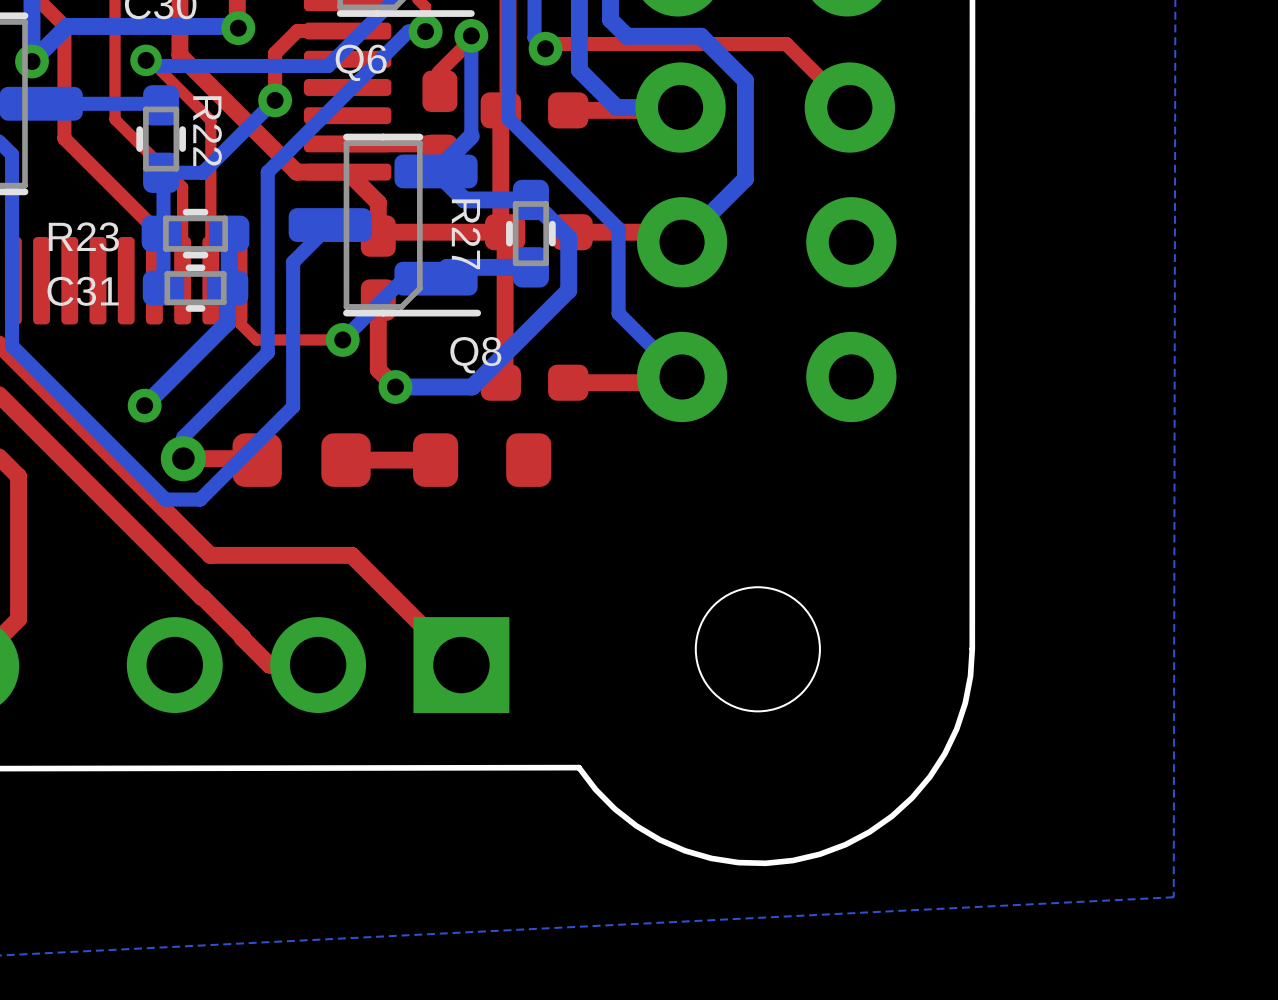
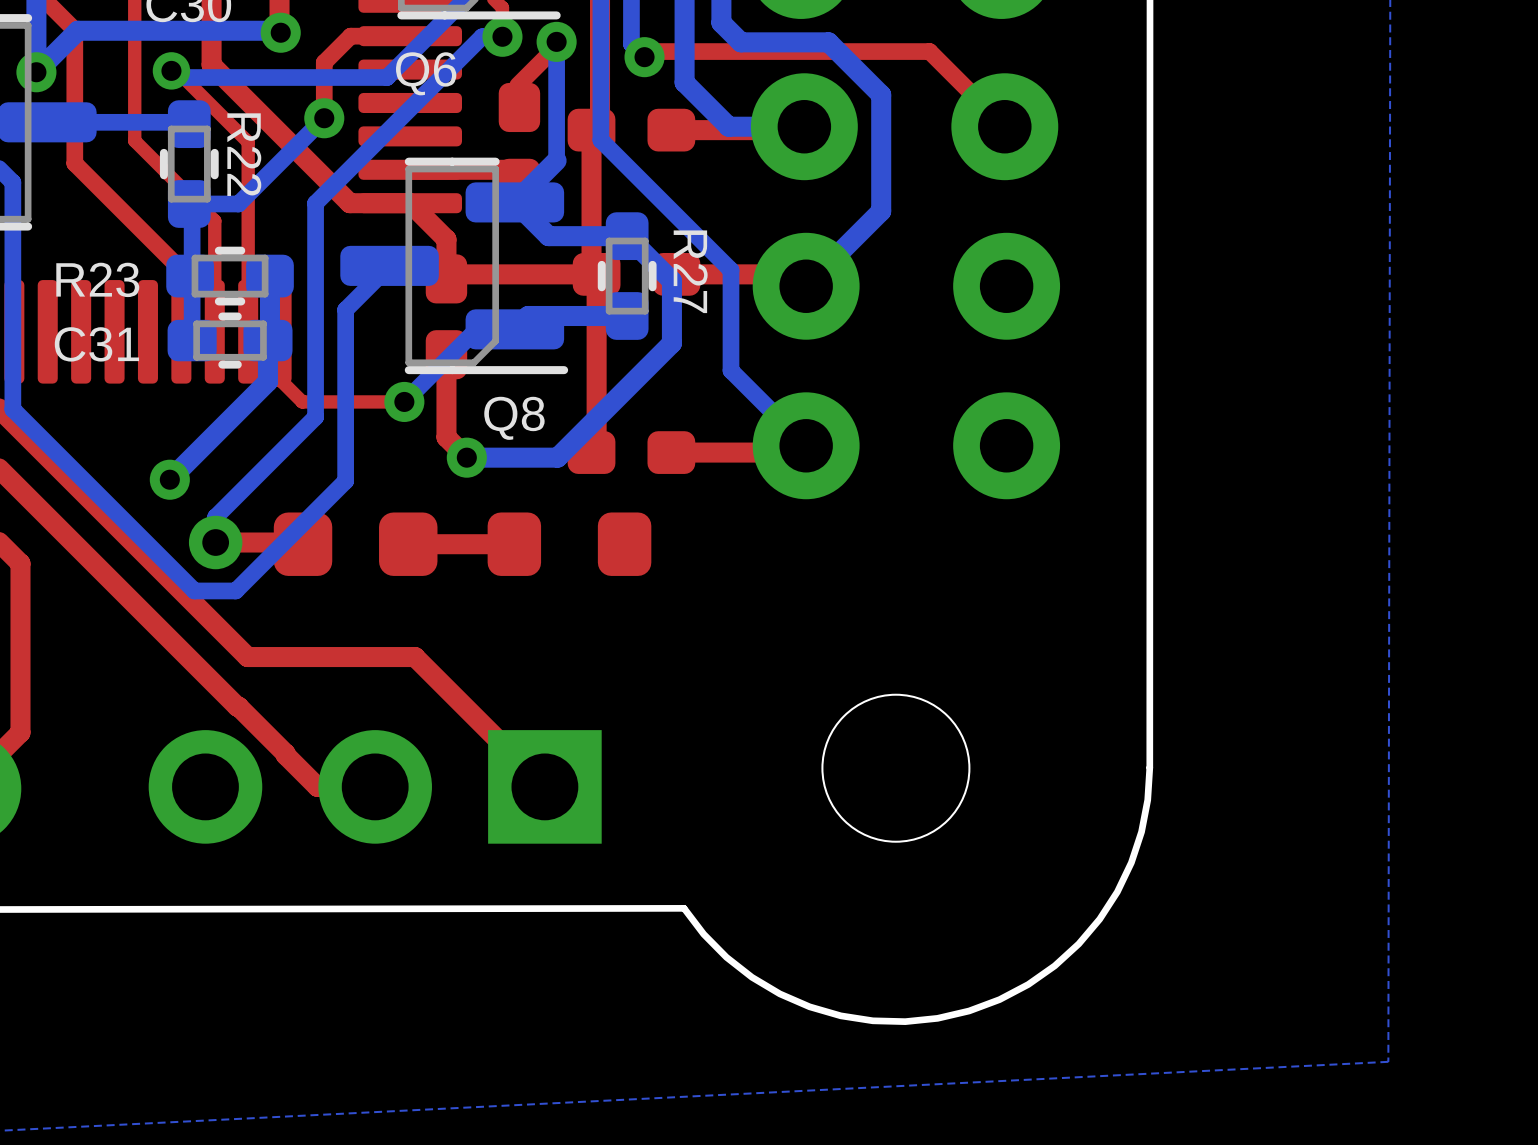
R27 name position: R27 (466, 234) -> R27 (690, 271)
Q8 name position: Q8 (475, 355) -> Q8 (514, 418)

